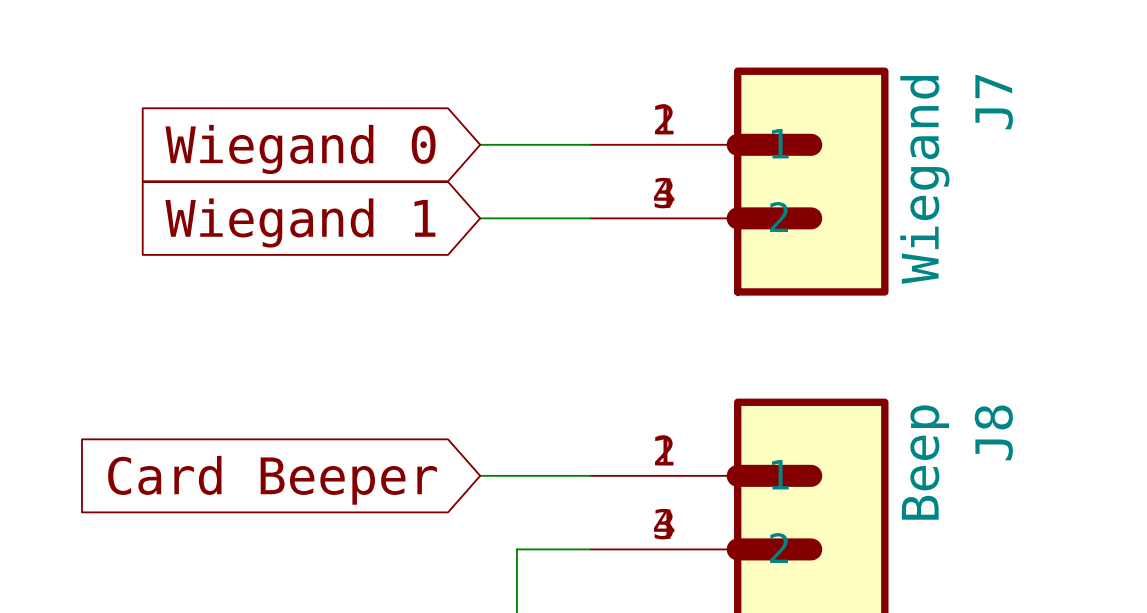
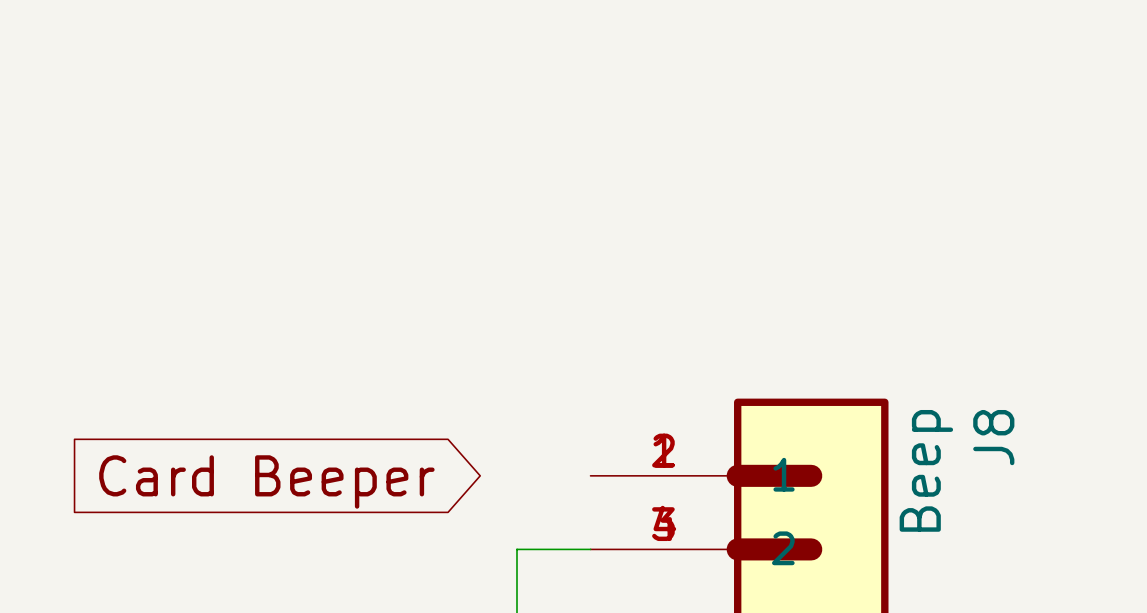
wire: (480, 144) (590, 144) -> none
global label: Wiegand 0 (300, 149) -> none
J7: Wiegand (739, 181) -> none
wire: (480, 218) (590, 218) -> none
global label: Wiegand 1 (300, 223) -> none
wire: (480, 475) (590, 475) -> none

